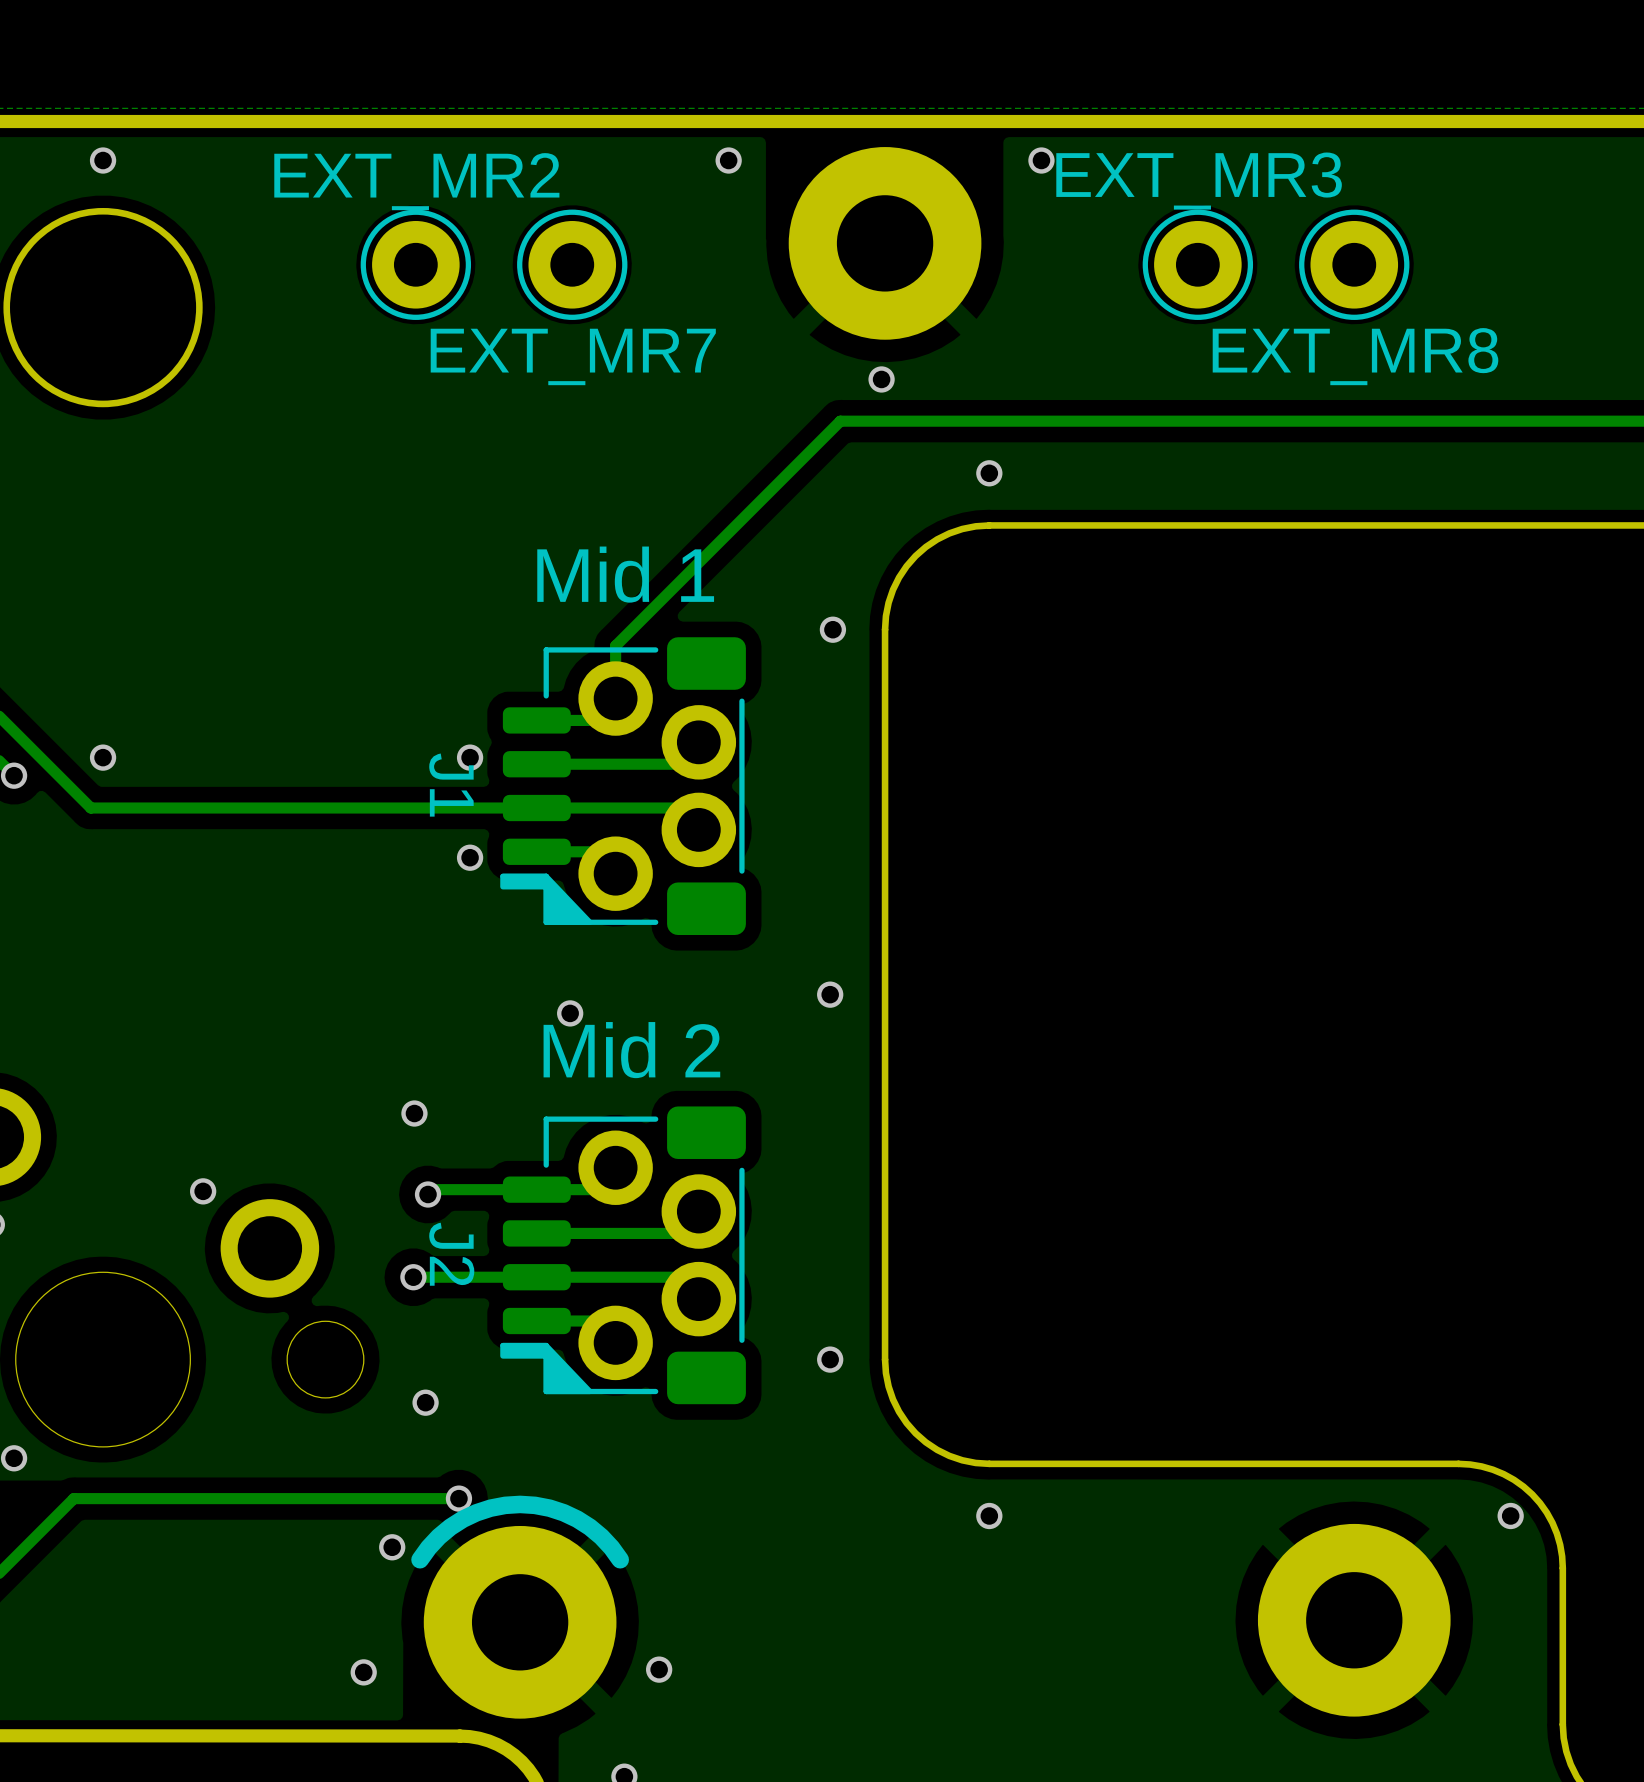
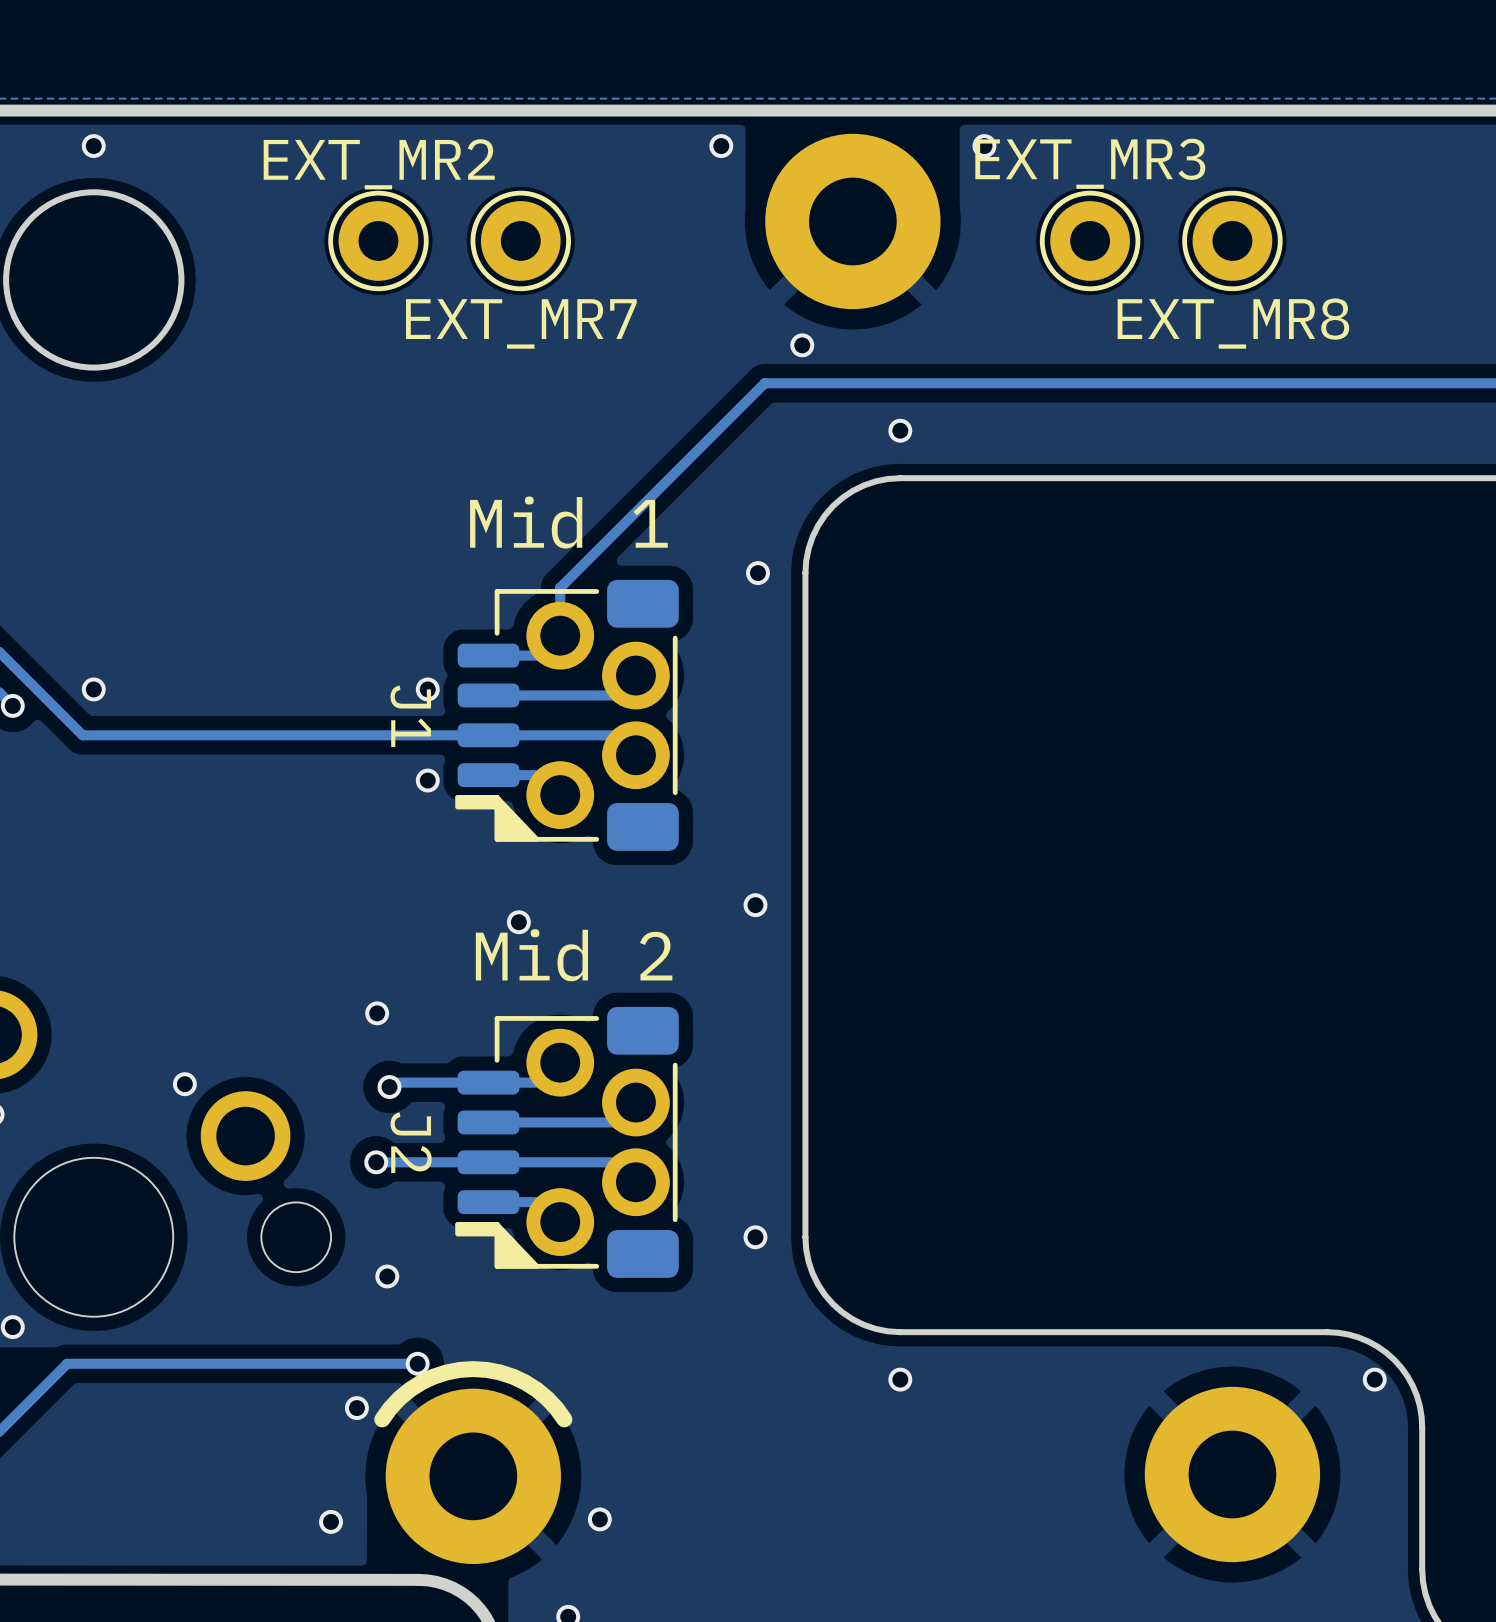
via position: (728, 160) -> (721, 146)
via position: (1041, 160) -> (984, 146)
part position: (885, 243) -> (852, 221)

